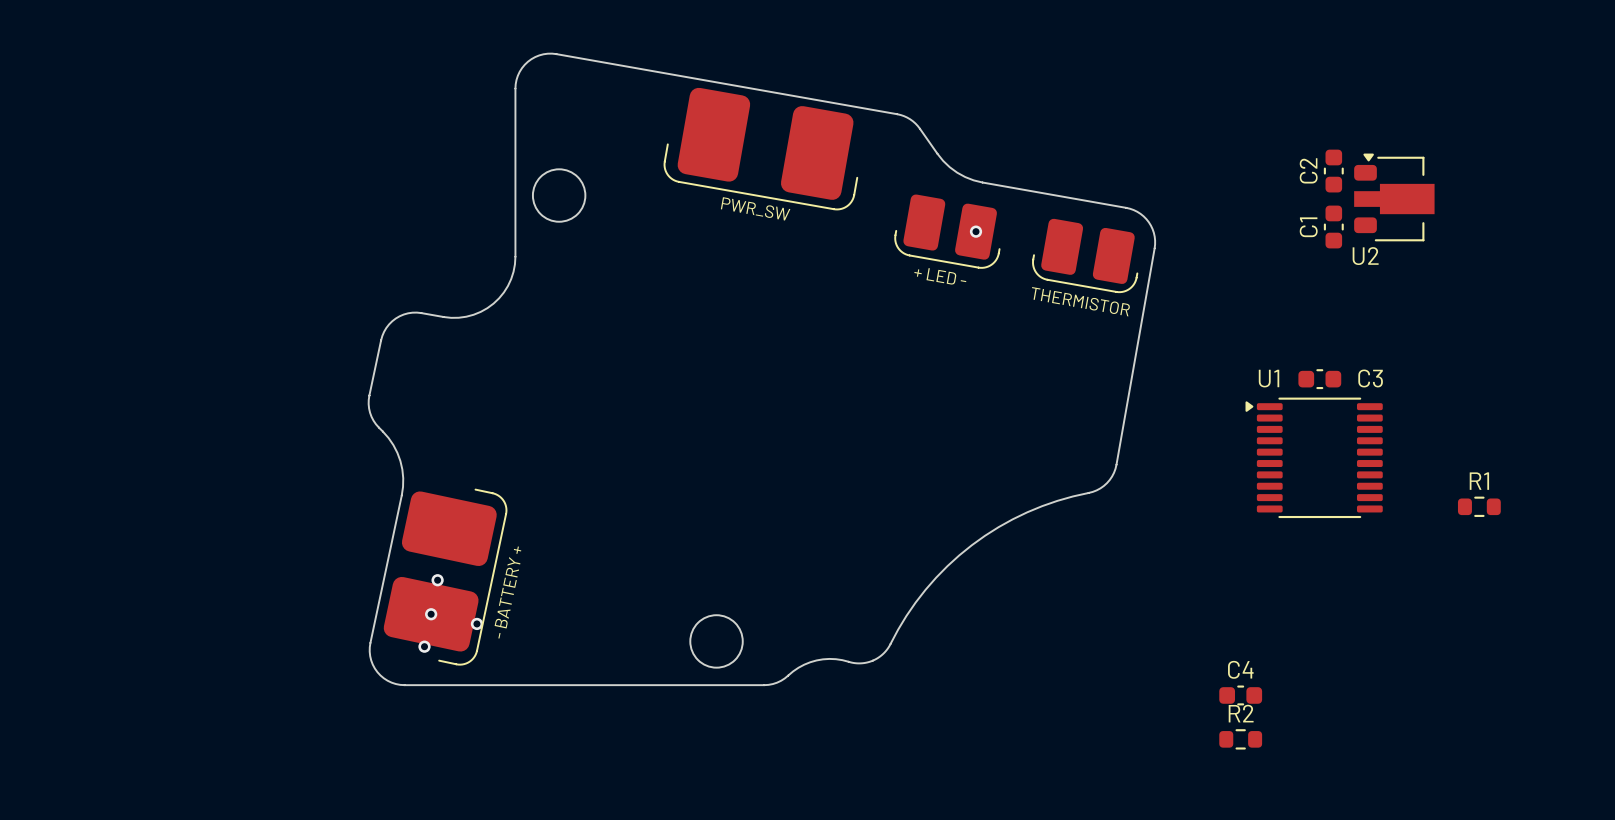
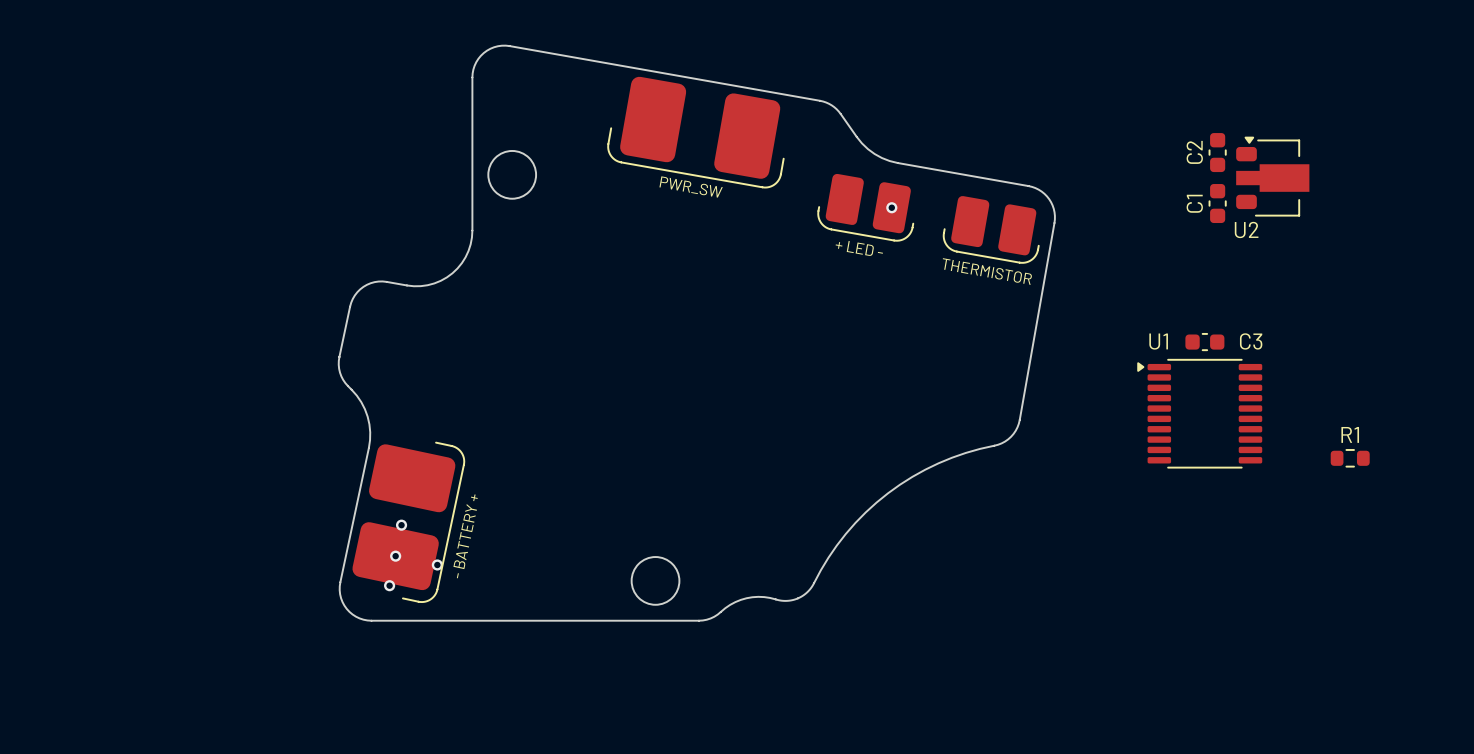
C4: (1240, 695) -> none
R2: (1240, 739) -> none

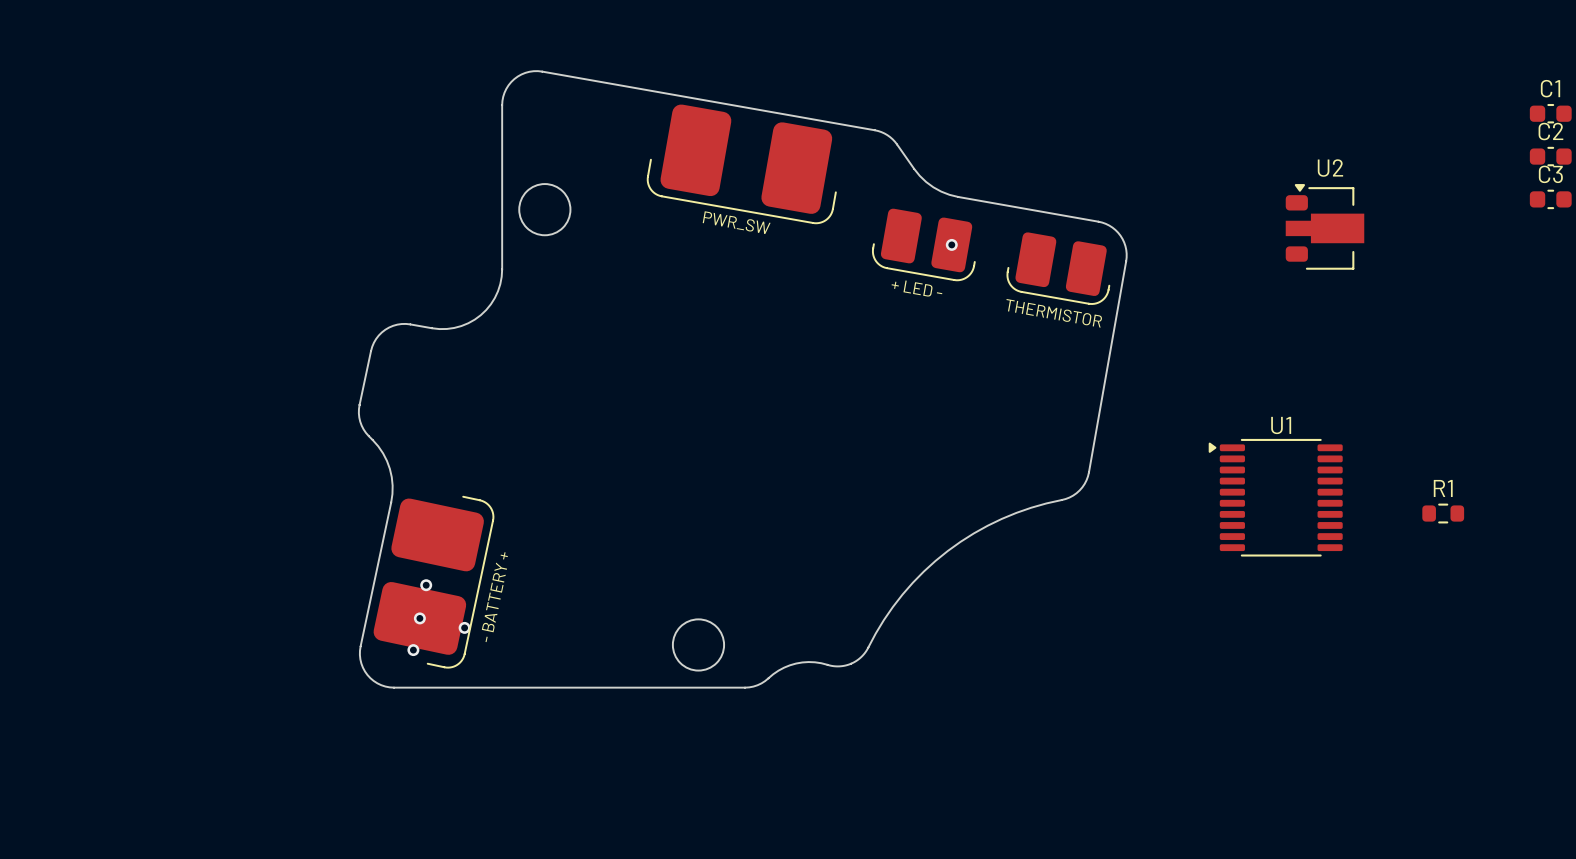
C2 rotation: 0° (1217, 152) -> 90° clockwise (1550, 156)
C2 position: (1217, 152) -> (1550, 156)
U2 position: (1272, 176) -> (1325, 226)
C1 rotation: 0° (1217, 203) -> 90° clockwise (1550, 113)
C1 position: (1217, 203) -> (1550, 113)
U2 name position: U2 (1246, 229) -> U2 (1330, 168)
U1 name position: U1 (1158, 341) -> U1 (1281, 425)
C3 name position: C3 (1251, 341) -> C3 (1550, 174)
C3 position: (1204, 342) -> (1550, 199)
U1 position: (1199, 413) -> (1275, 497)

